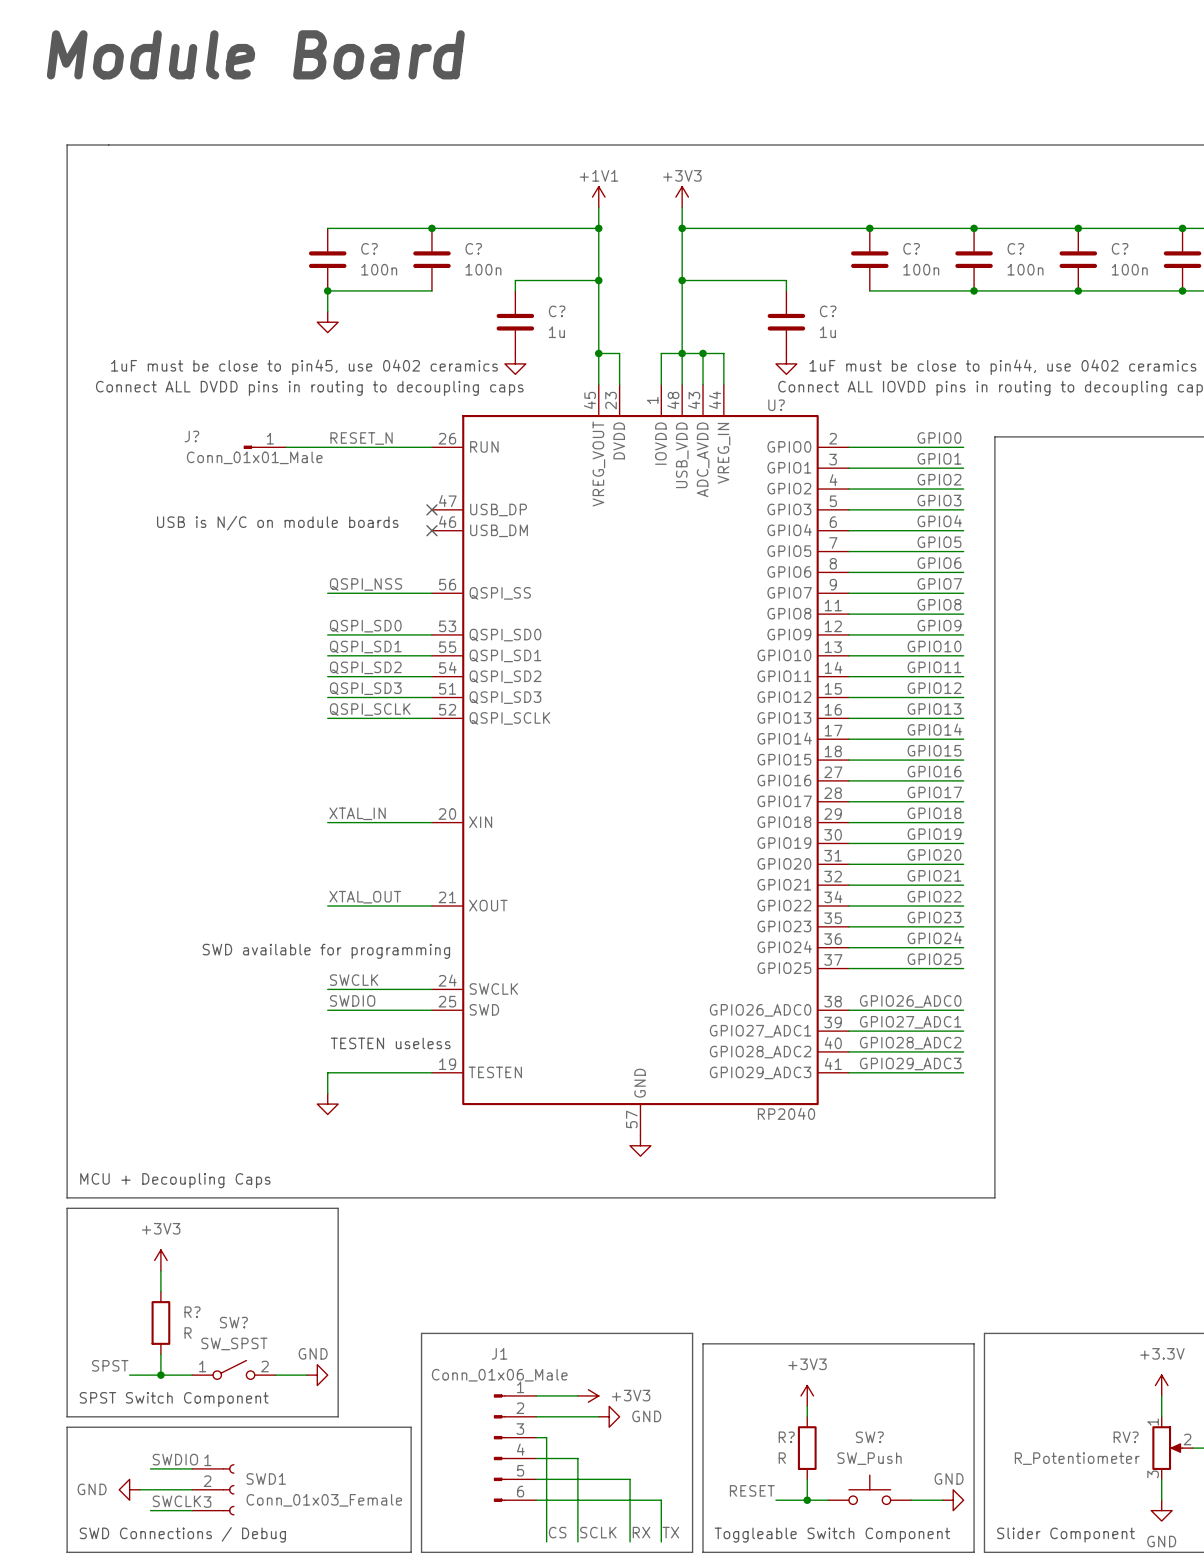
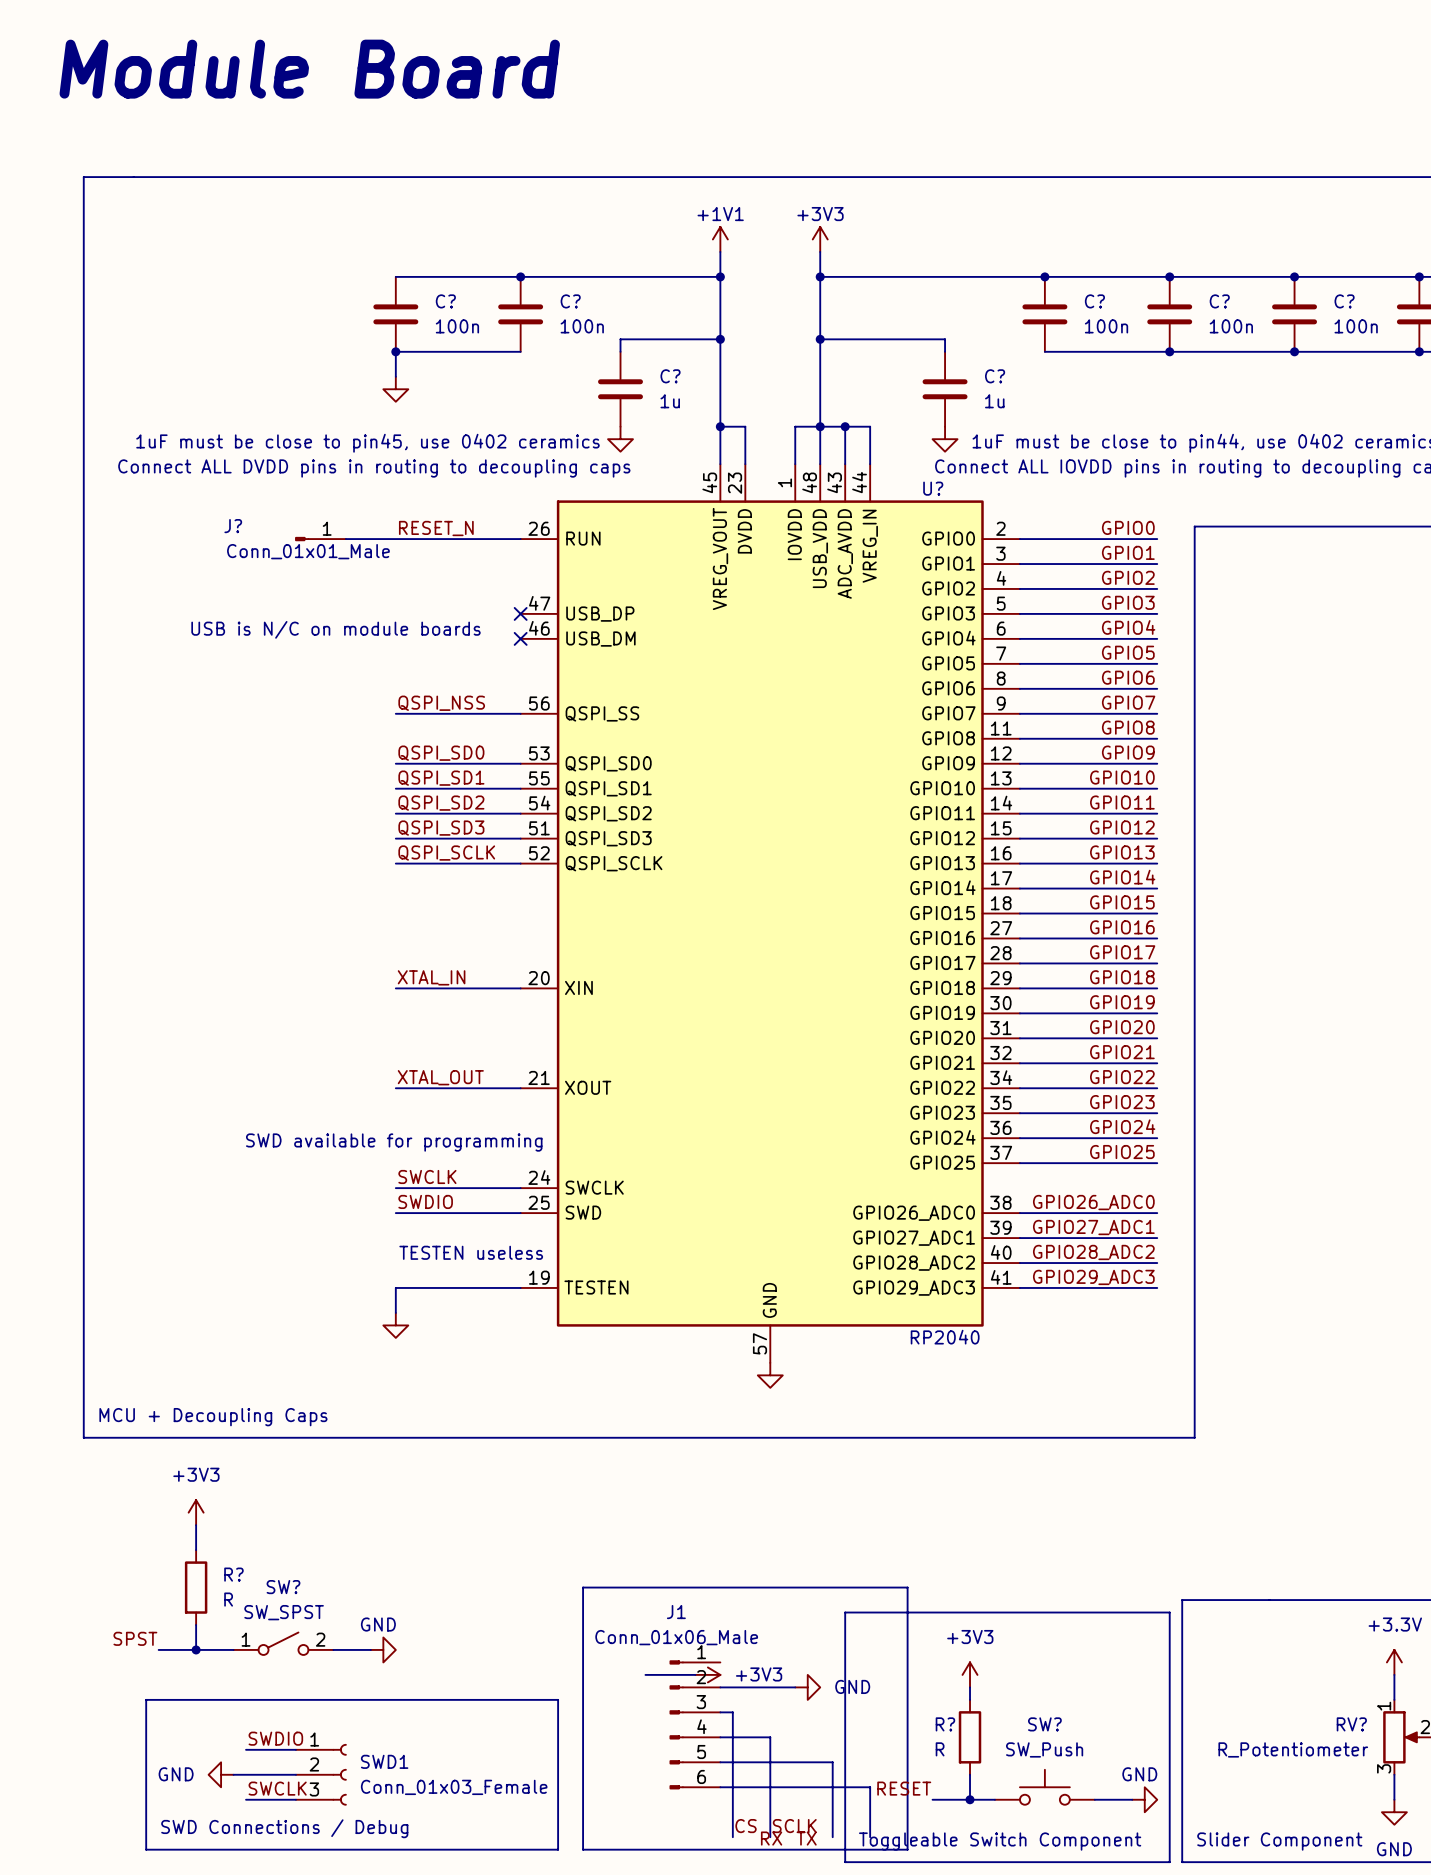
line: (421, 1333) (421, 1552) (692, 1552) (692, 1333) (421, 1333) -> (583, 1587) (583, 1849) (907, 1849) (907, 1587) (583, 1587)
text: SPST Switch Component (174, 1399) -> none
line: (119, 1416) (67, 1416) (67, 1208) (338, 1208) (338, 1416) -> (146, 1699) (146, 1849) (558, 1849) (558, 1699) (408, 1699)
wire: (536, 1416) (598, 1416) -> (720, 1687) (795, 1687)
power symbol position: GND (609, 1416) -> GND (807, 1687)
line: (67, 1427) (67, 1552) (411, 1552) (411, 1427) (67, 1427) -> none
wire: (536, 1437) (546, 1437) (546, 1541) -> (720, 1712) (732, 1712) (732, 1837)
J1 position: (515, 1448) -> (695, 1724)
wire: (536, 1458) (577, 1458) (577, 1541) -> (720, 1737) (770, 1737) (770, 1837)
label position: SWDIO (175, 1459) -> SWDIO (275, 1738)
wire: (150, 1468) (192, 1468) -> (246, 1749) (295, 1749)
wire: (536, 1479) (630, 1479) (630, 1541) -> (720, 1762) (832, 1762) (832, 1837)
power symbol position: GND (129, 1489) -> GND (221, 1774)
wire: (140, 1489) (192, 1489) -> (233, 1774) (295, 1774)
SWD1 position: (213, 1489) -> (321, 1774)
wire: (536, 1500) (661, 1500) (661, 1541) -> (720, 1787) (870, 1787) (870, 1837)
label position: SWCLK (176, 1501) -> SWCLK (277, 1788)
wire: (150, 1510) (192, 1510) -> (246, 1799) (295, 1799)
label position: CS (557, 1532) -> CS (746, 1826)
label position: SCLK (598, 1532) -> SCLK (794, 1826)
text position: SWD Connections / Debug (182, 1534) -> SWD Connections / Debug (284, 1828)

